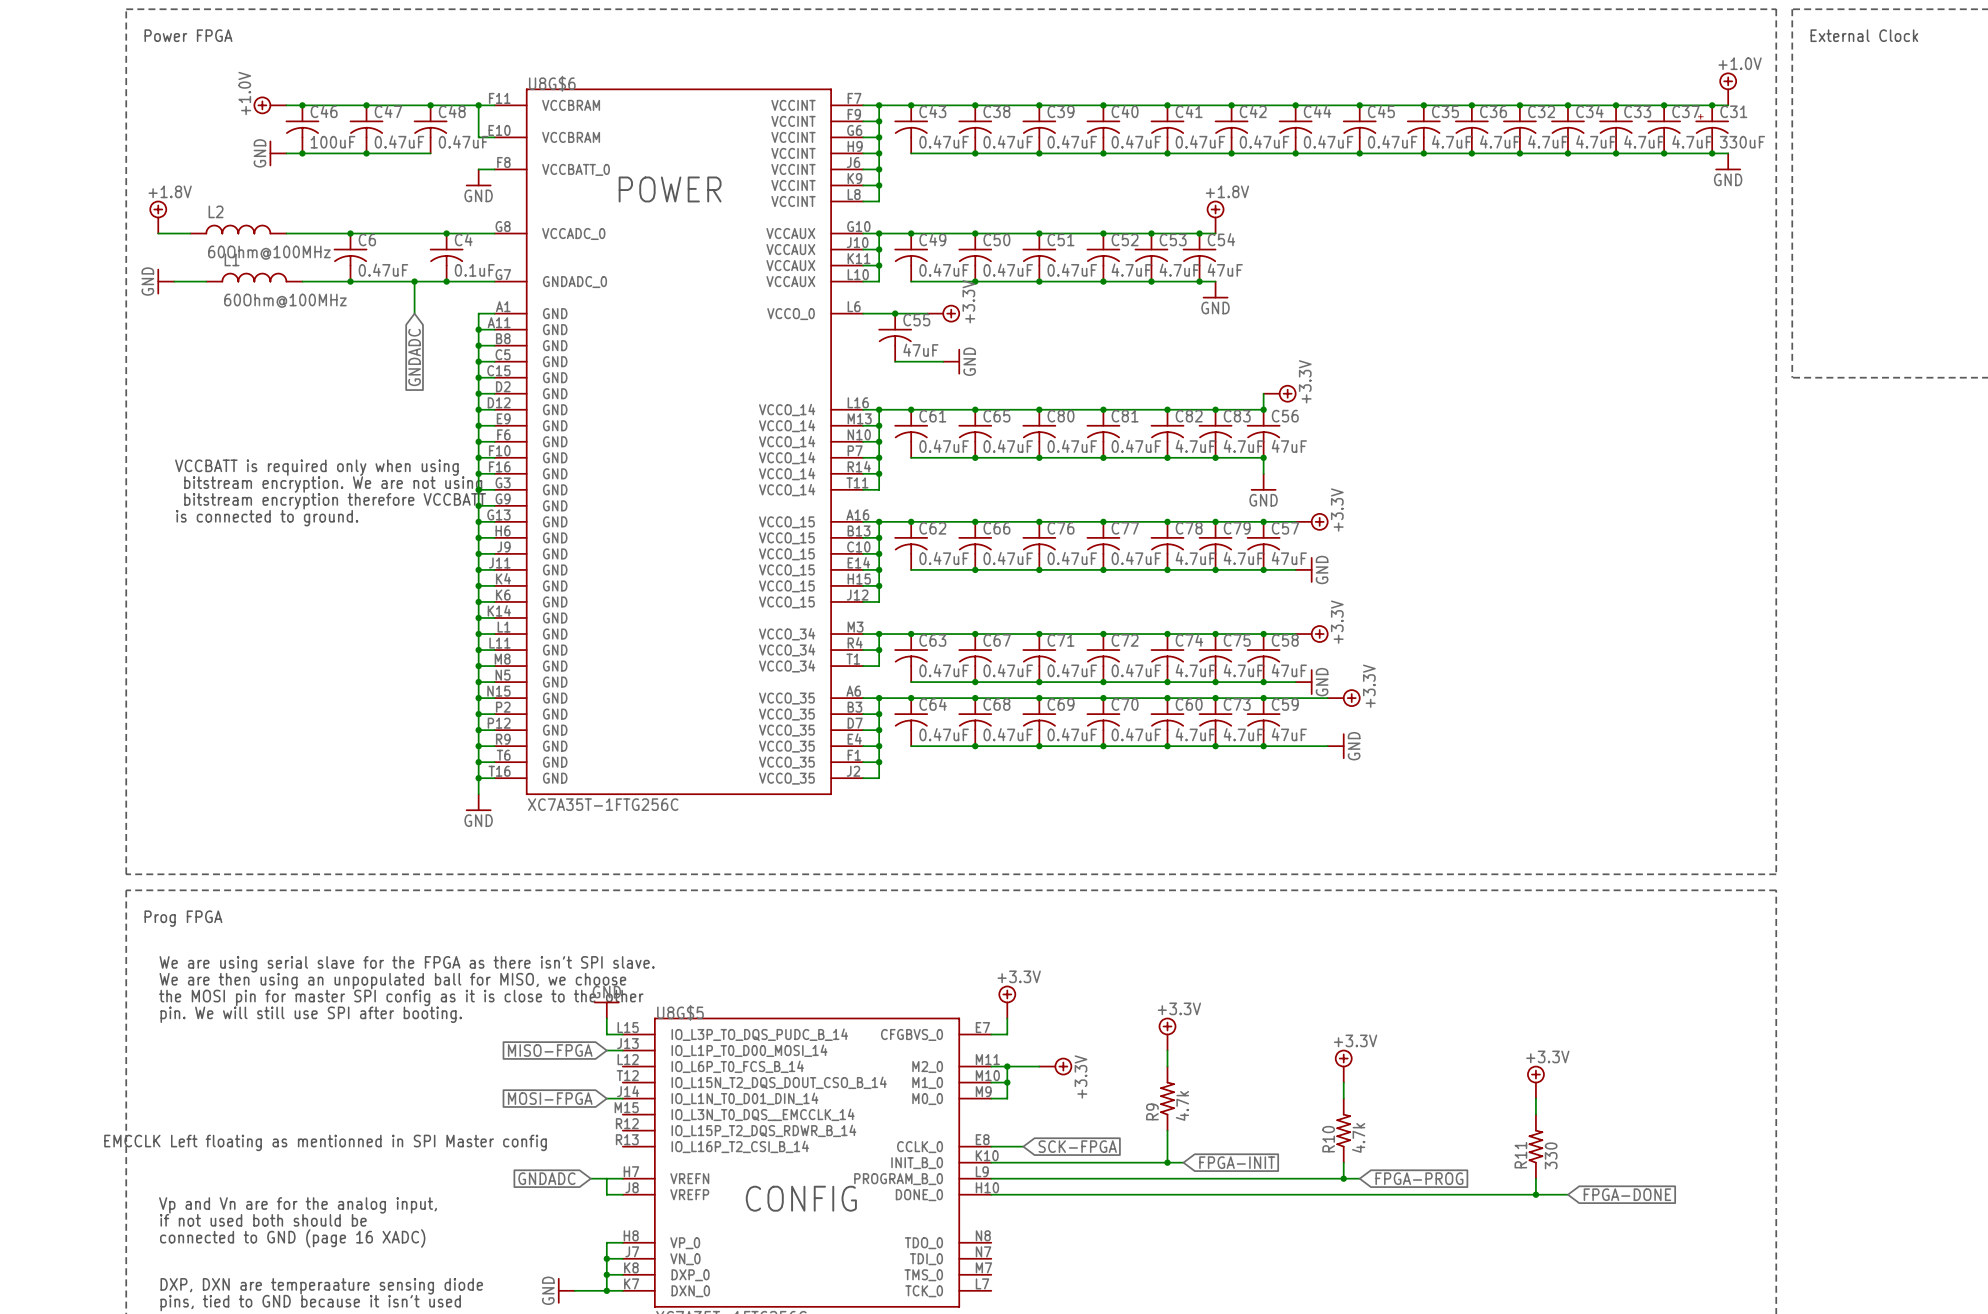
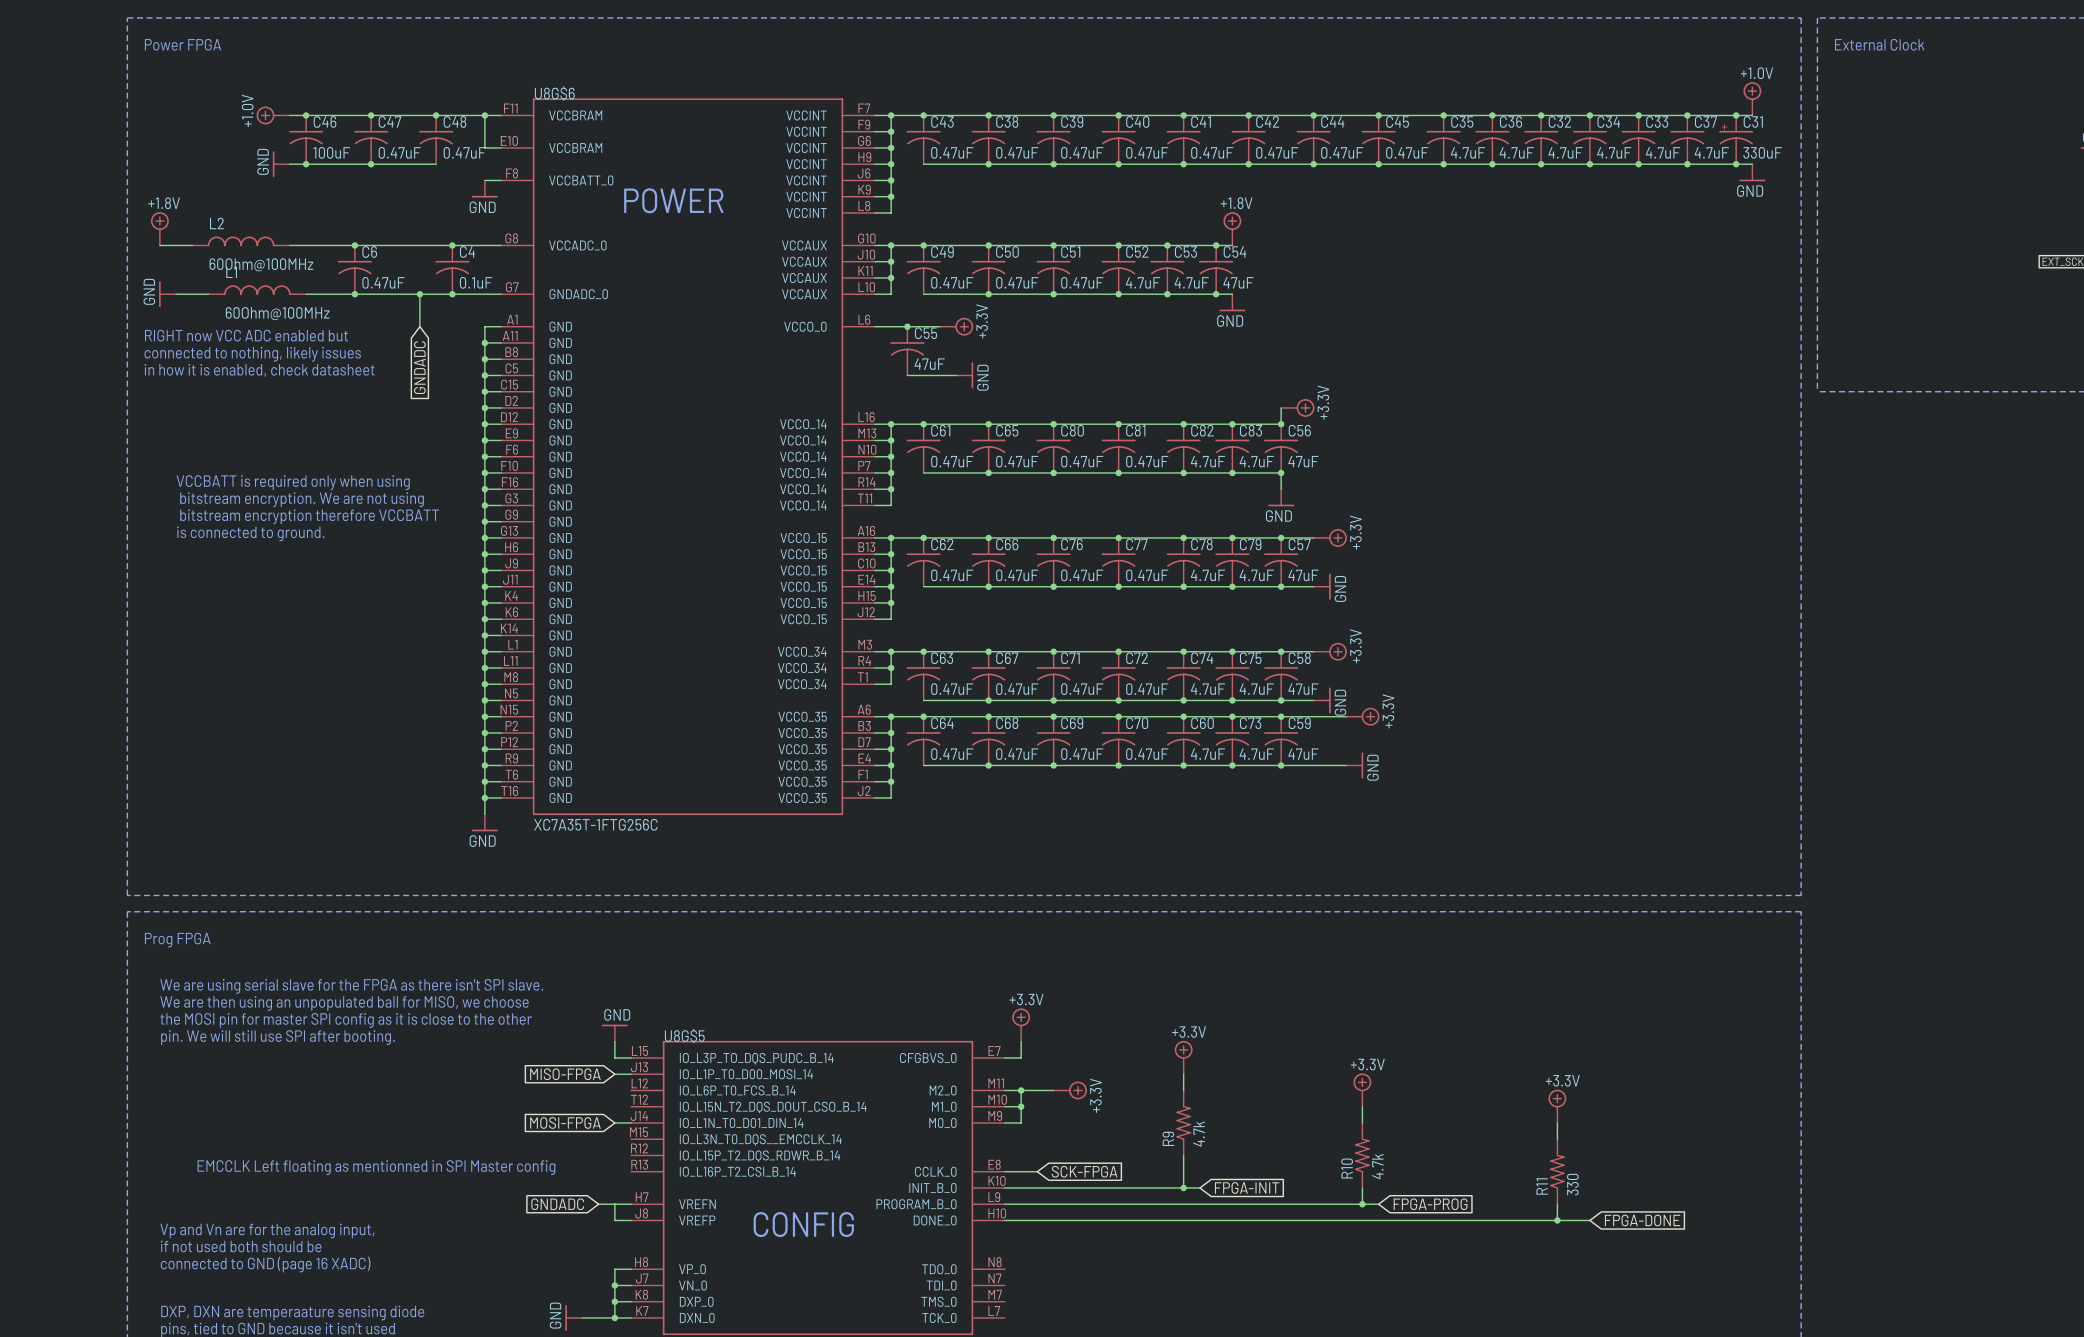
text: none -> RIGHT now VCC ADC enabled but (246, 335)
text: none -> connected to nothing, likely issues (252, 354)
text: none -> in how it is enabled, check datasheet (259, 370)

